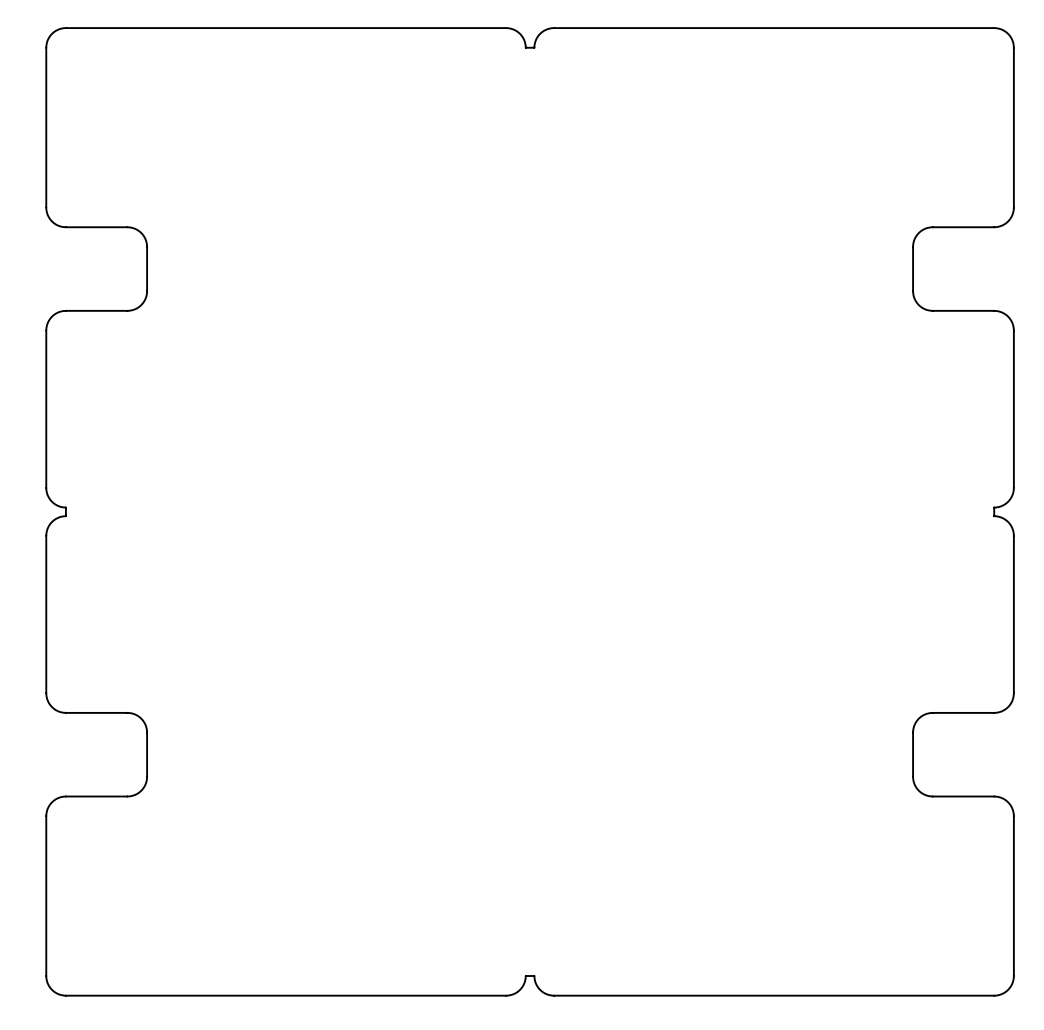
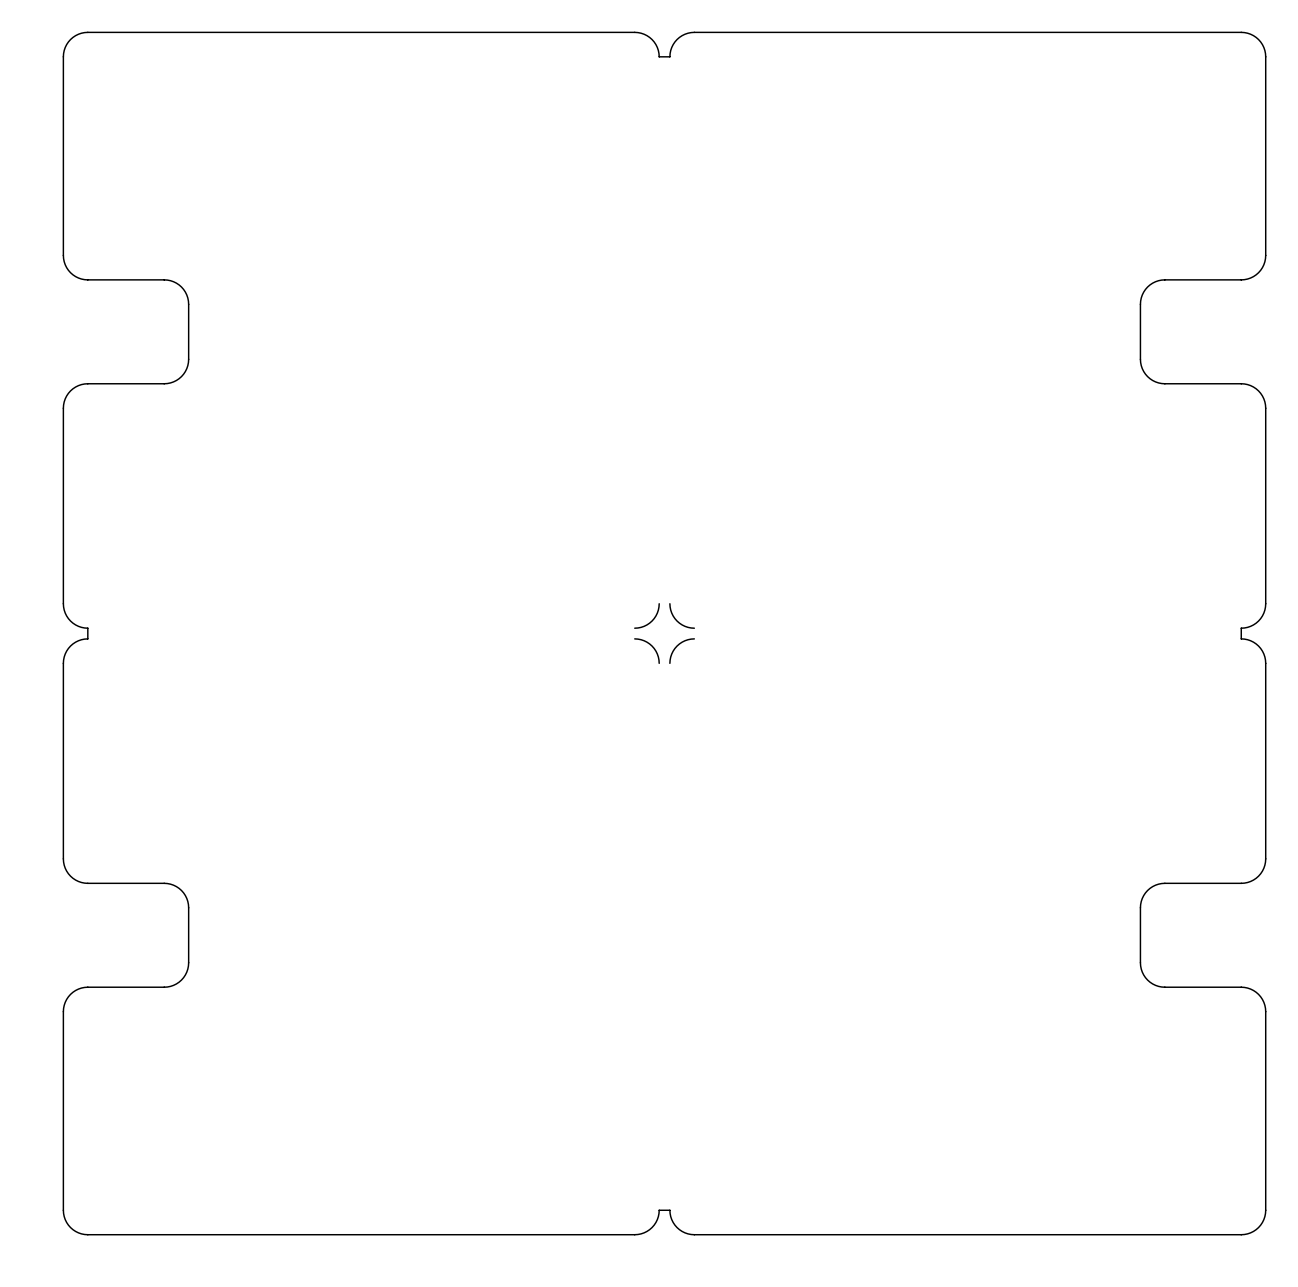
board edge: none -> (659, 603) (657, 613) (652, 621) (644, 626) (634, 628)
board edge: none -> (669, 603) (671, 613) (677, 621) (684, 626) (694, 628)
board edge: none -> (634, 638) (644, 640) (652, 646) (657, 653) (659, 663)
board edge: none -> (694, 638) (684, 640) (677, 646) (671, 653) (669, 663)

